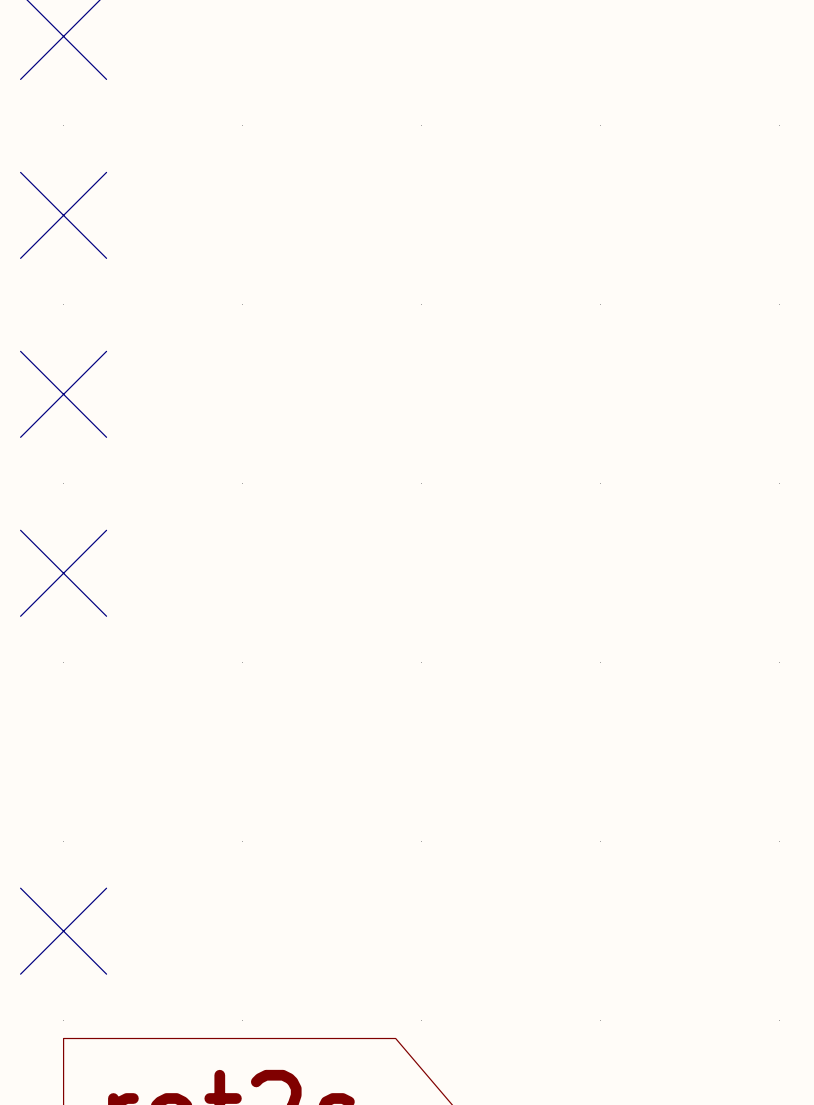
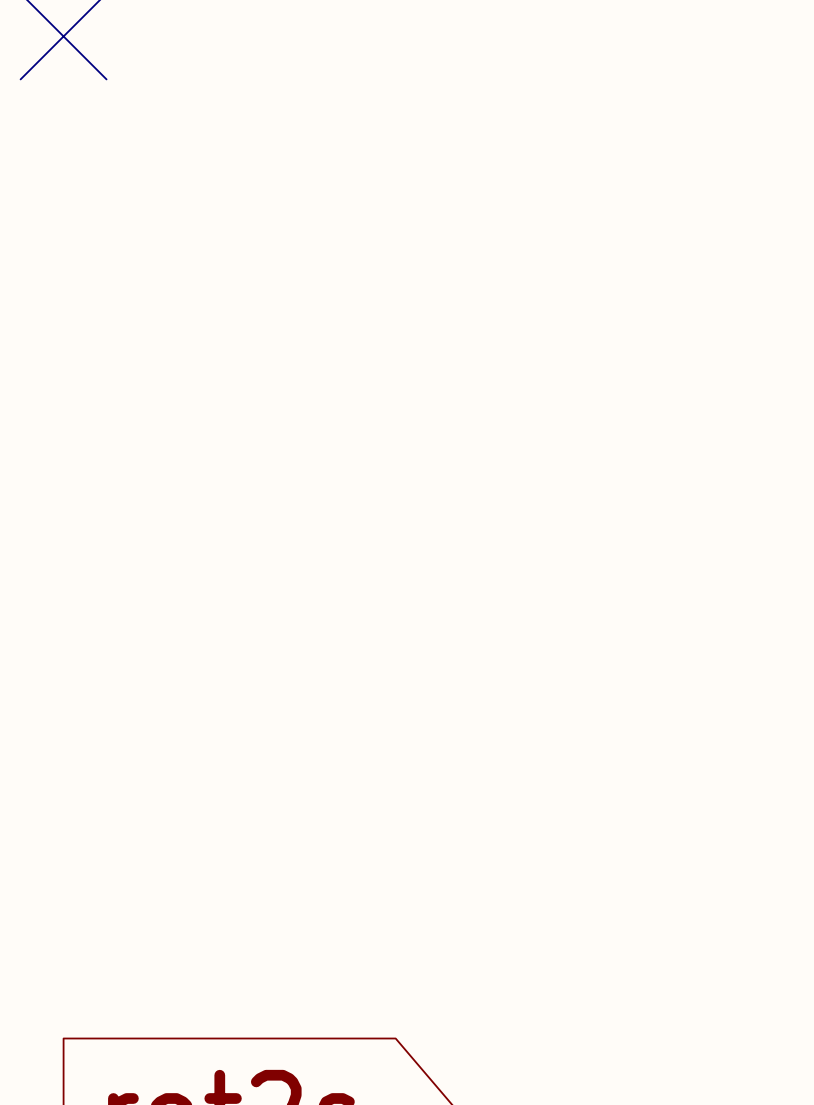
no-connect mark: (63, 215) -> none
no-connect mark: (63, 394) -> none
no-connect mark: (63, 573) -> none
no-connect mark: (63, 931) -> none

